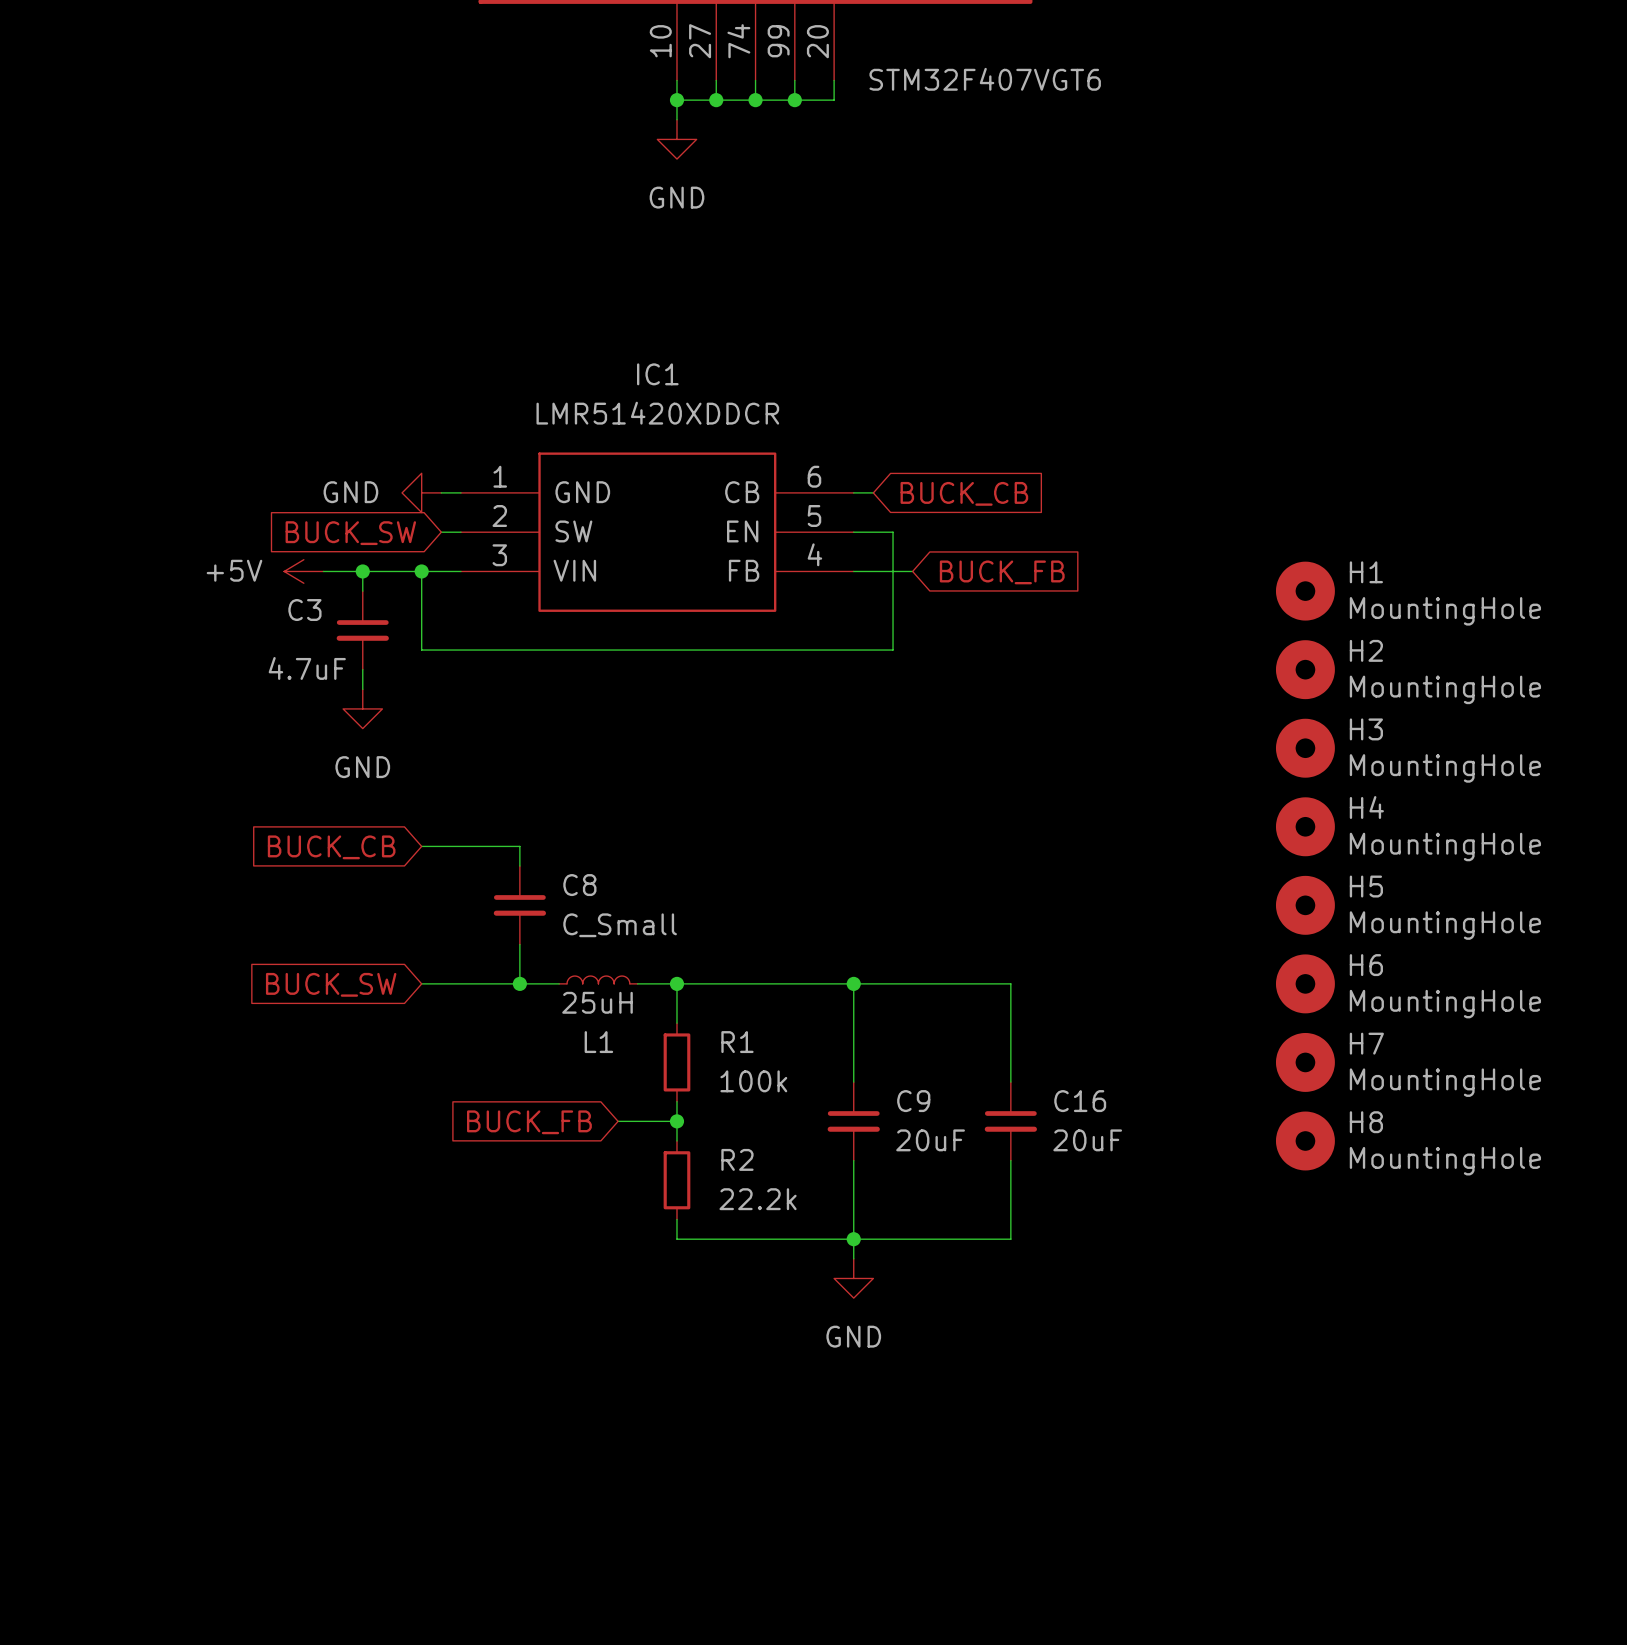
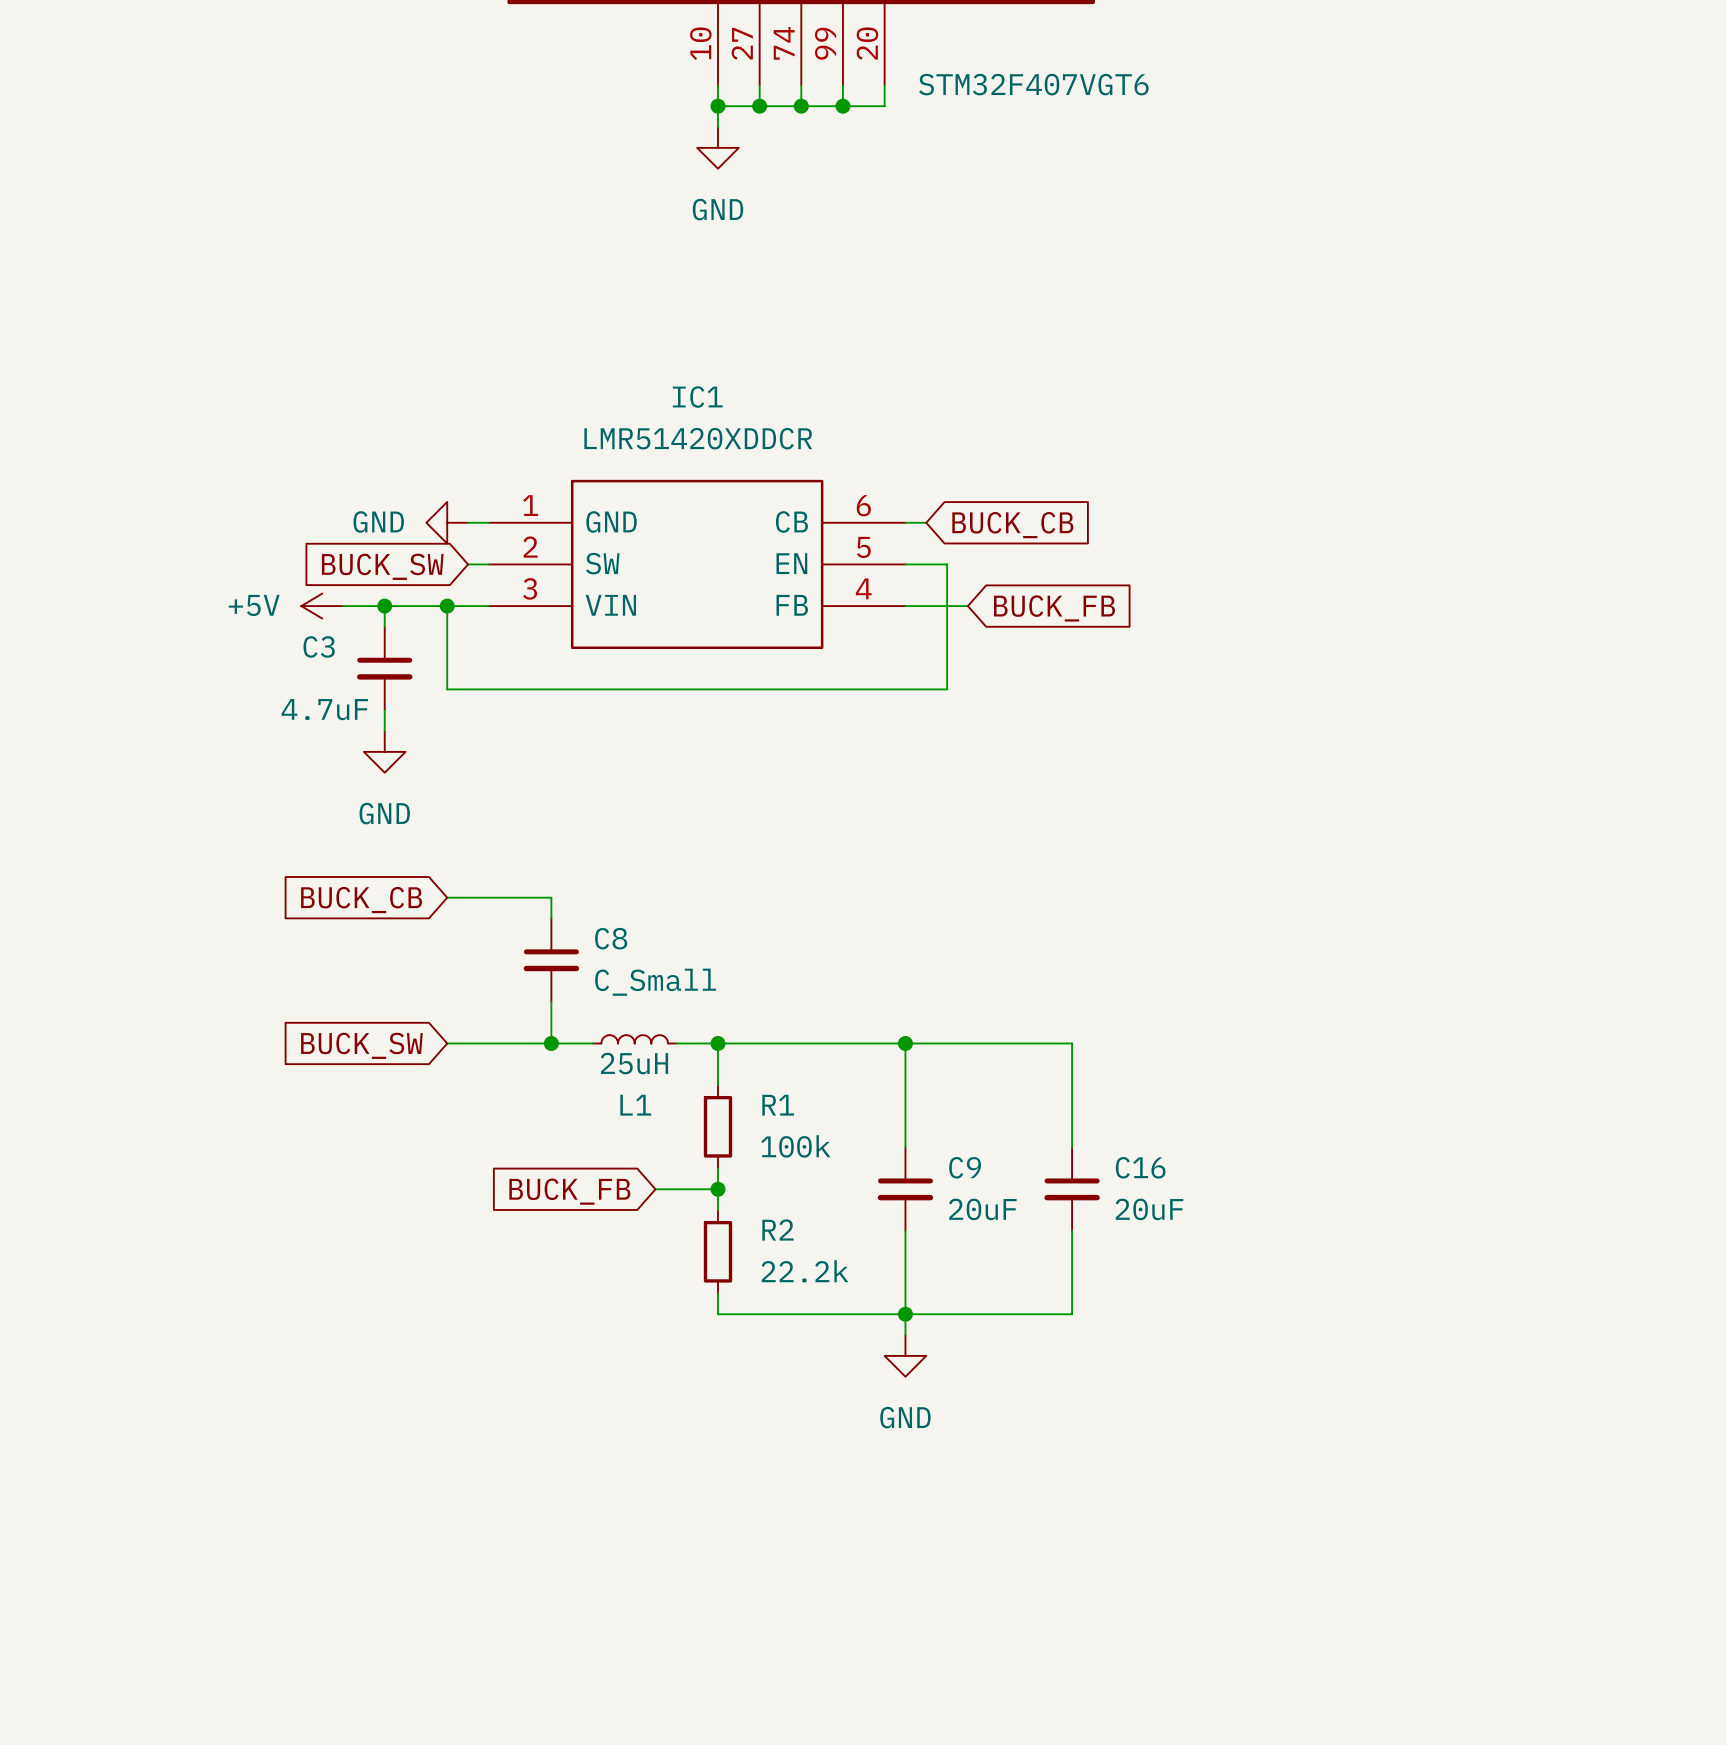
H1: MountingHole (1305, 591) -> none
H2: MountingHole (1305, 669) -> none
H3: MountingHole (1305, 748) -> none
H4: MountingHole (1305, 826) -> none
H5: MountingHole (1305, 905) -> none
H6: MountingHole (1305, 983) -> none
H7: MountingHole (1305, 1062) -> none
H8: MountingHole (1305, 1141) -> none

